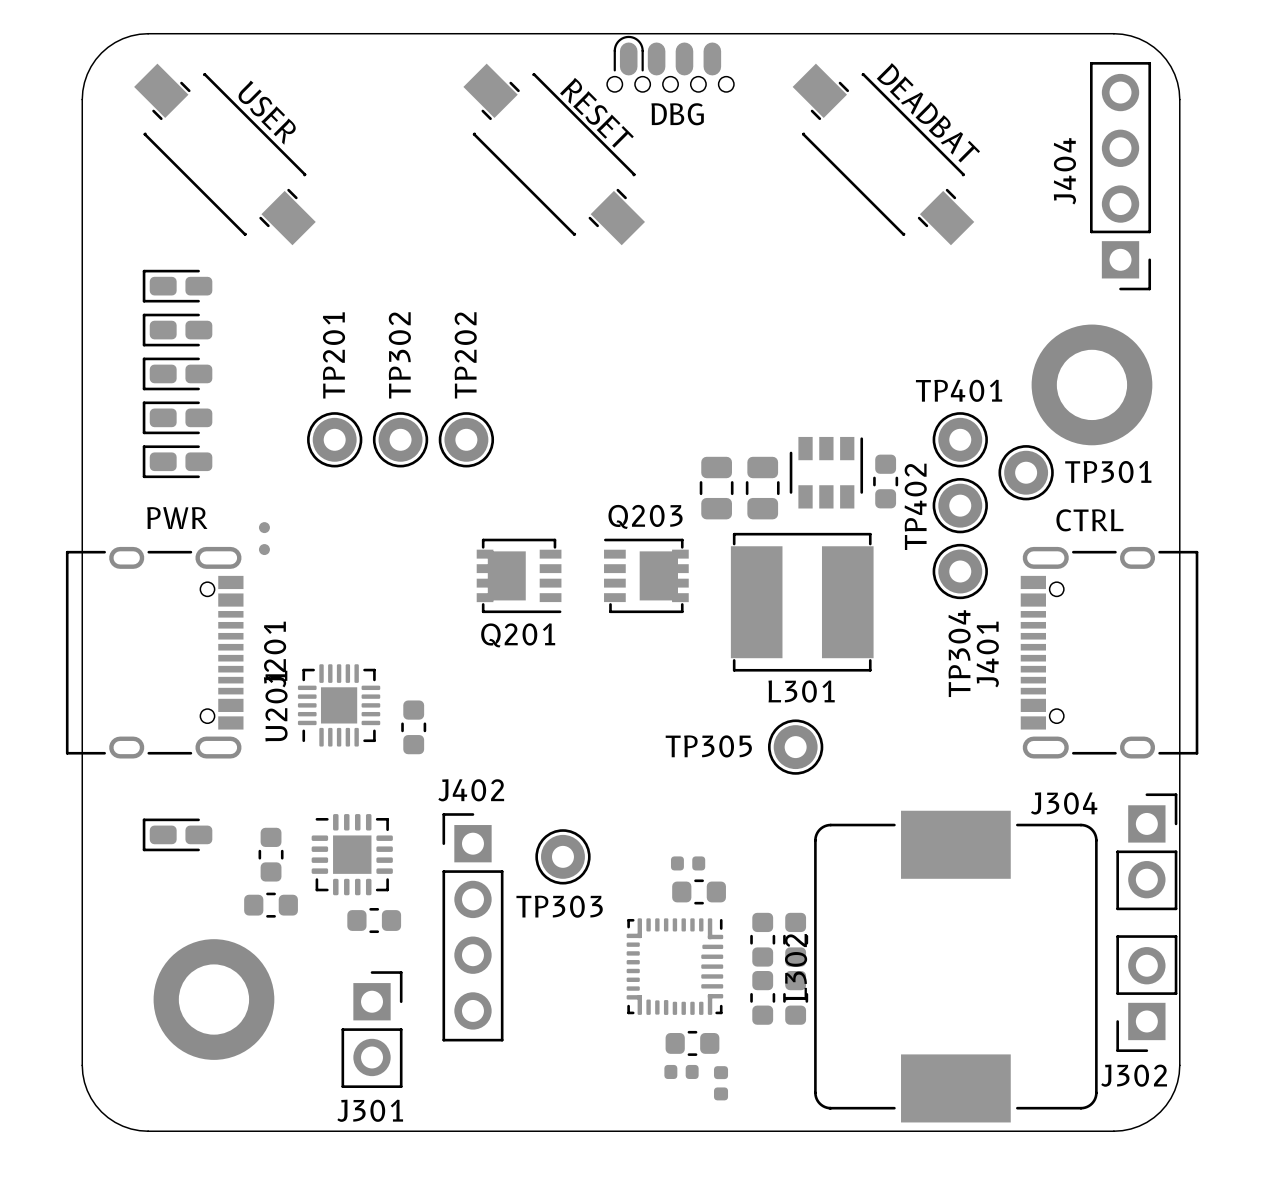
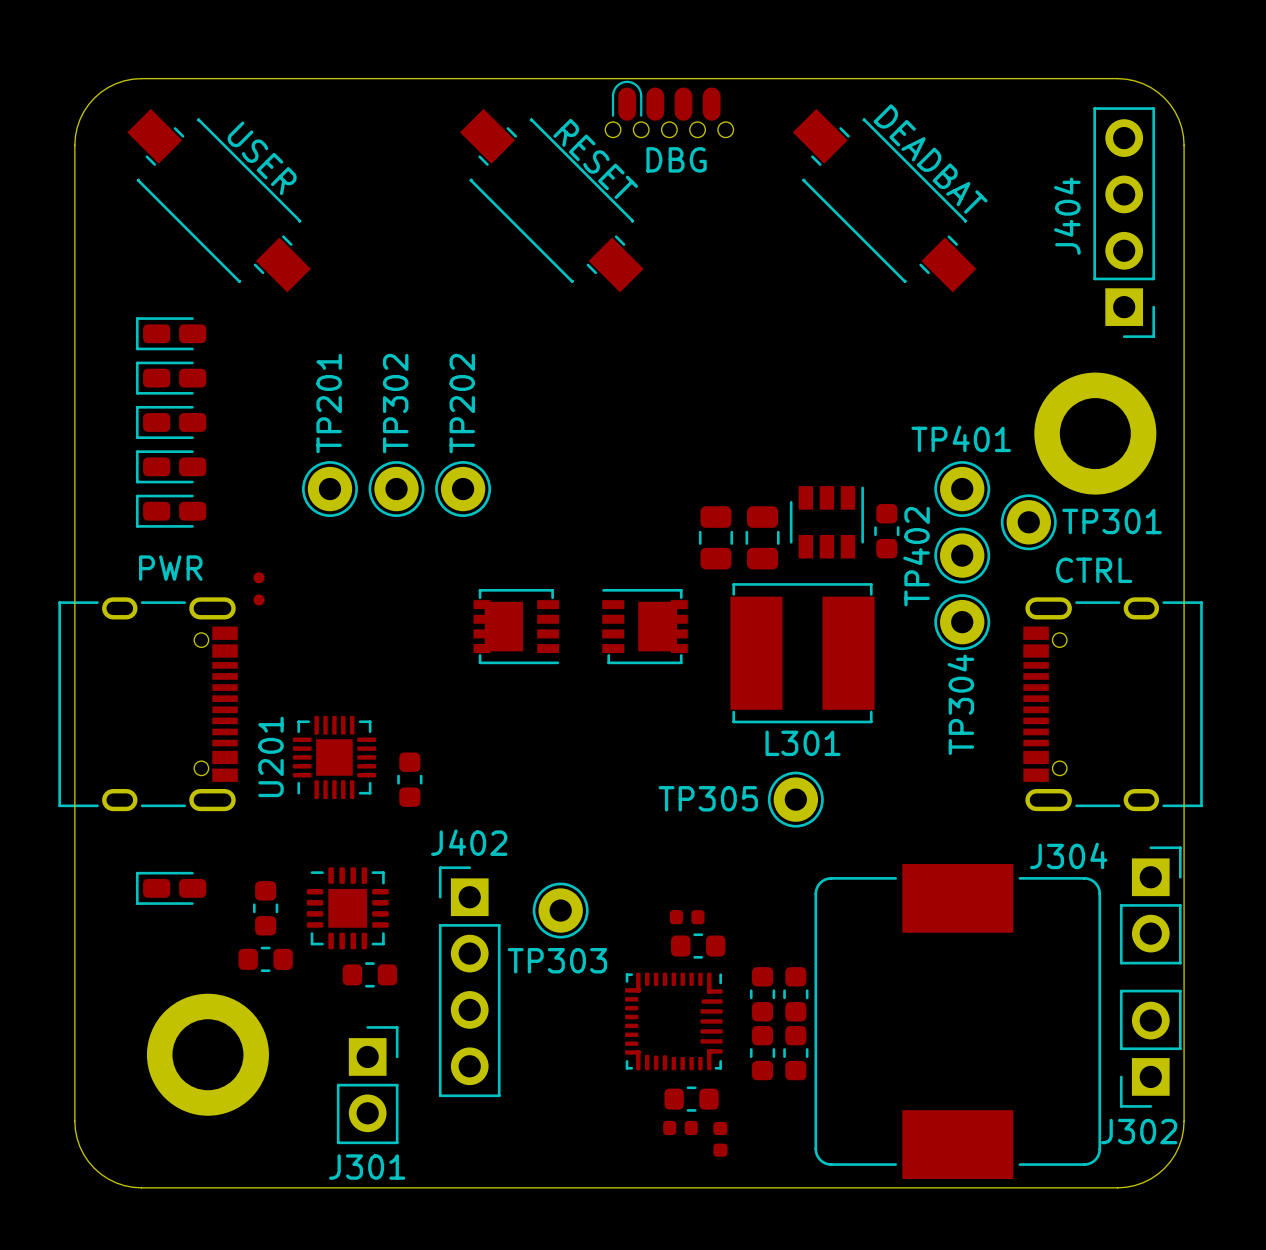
Q203 name: Q203 (645, 516) -> none
Q201 name: Q201 (518, 635) -> none
J201 name: J201 (275, 654) -> none
J401 name: J401 (987, 654) -> none
L302 name: L302 (796, 967) -> none

